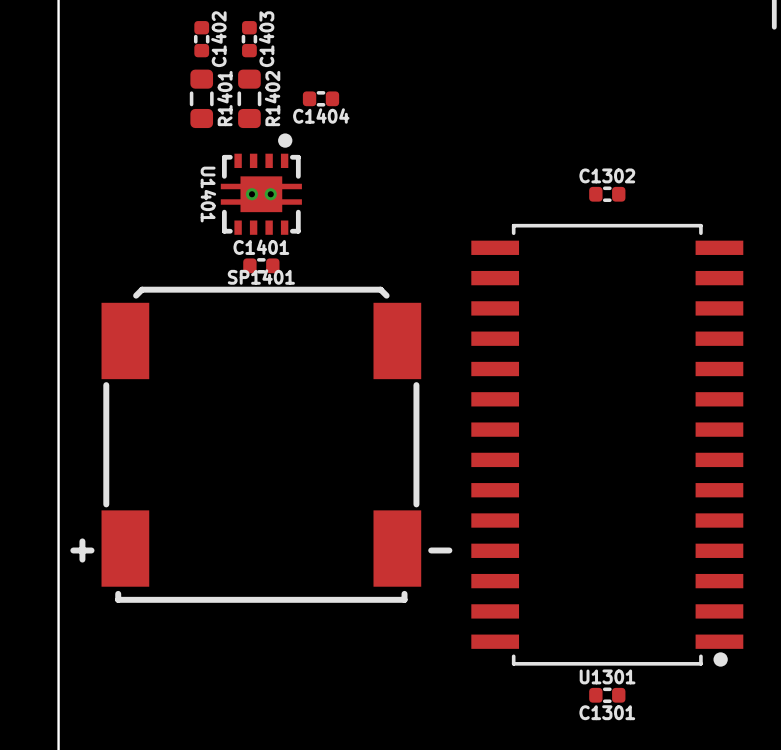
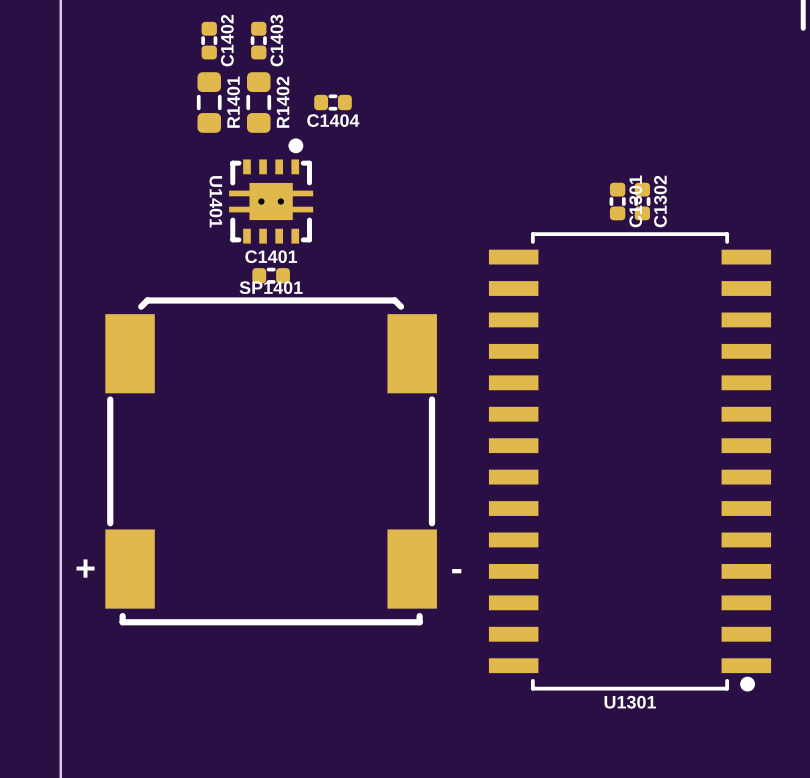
C1302 rotation: 0° (607, 194) -> 90° clockwise (642, 201)
C1301 rotation: 0° (607, 695) -> 90° clockwise (617, 201)
C1301 position: (607, 695) -> (617, 201)

